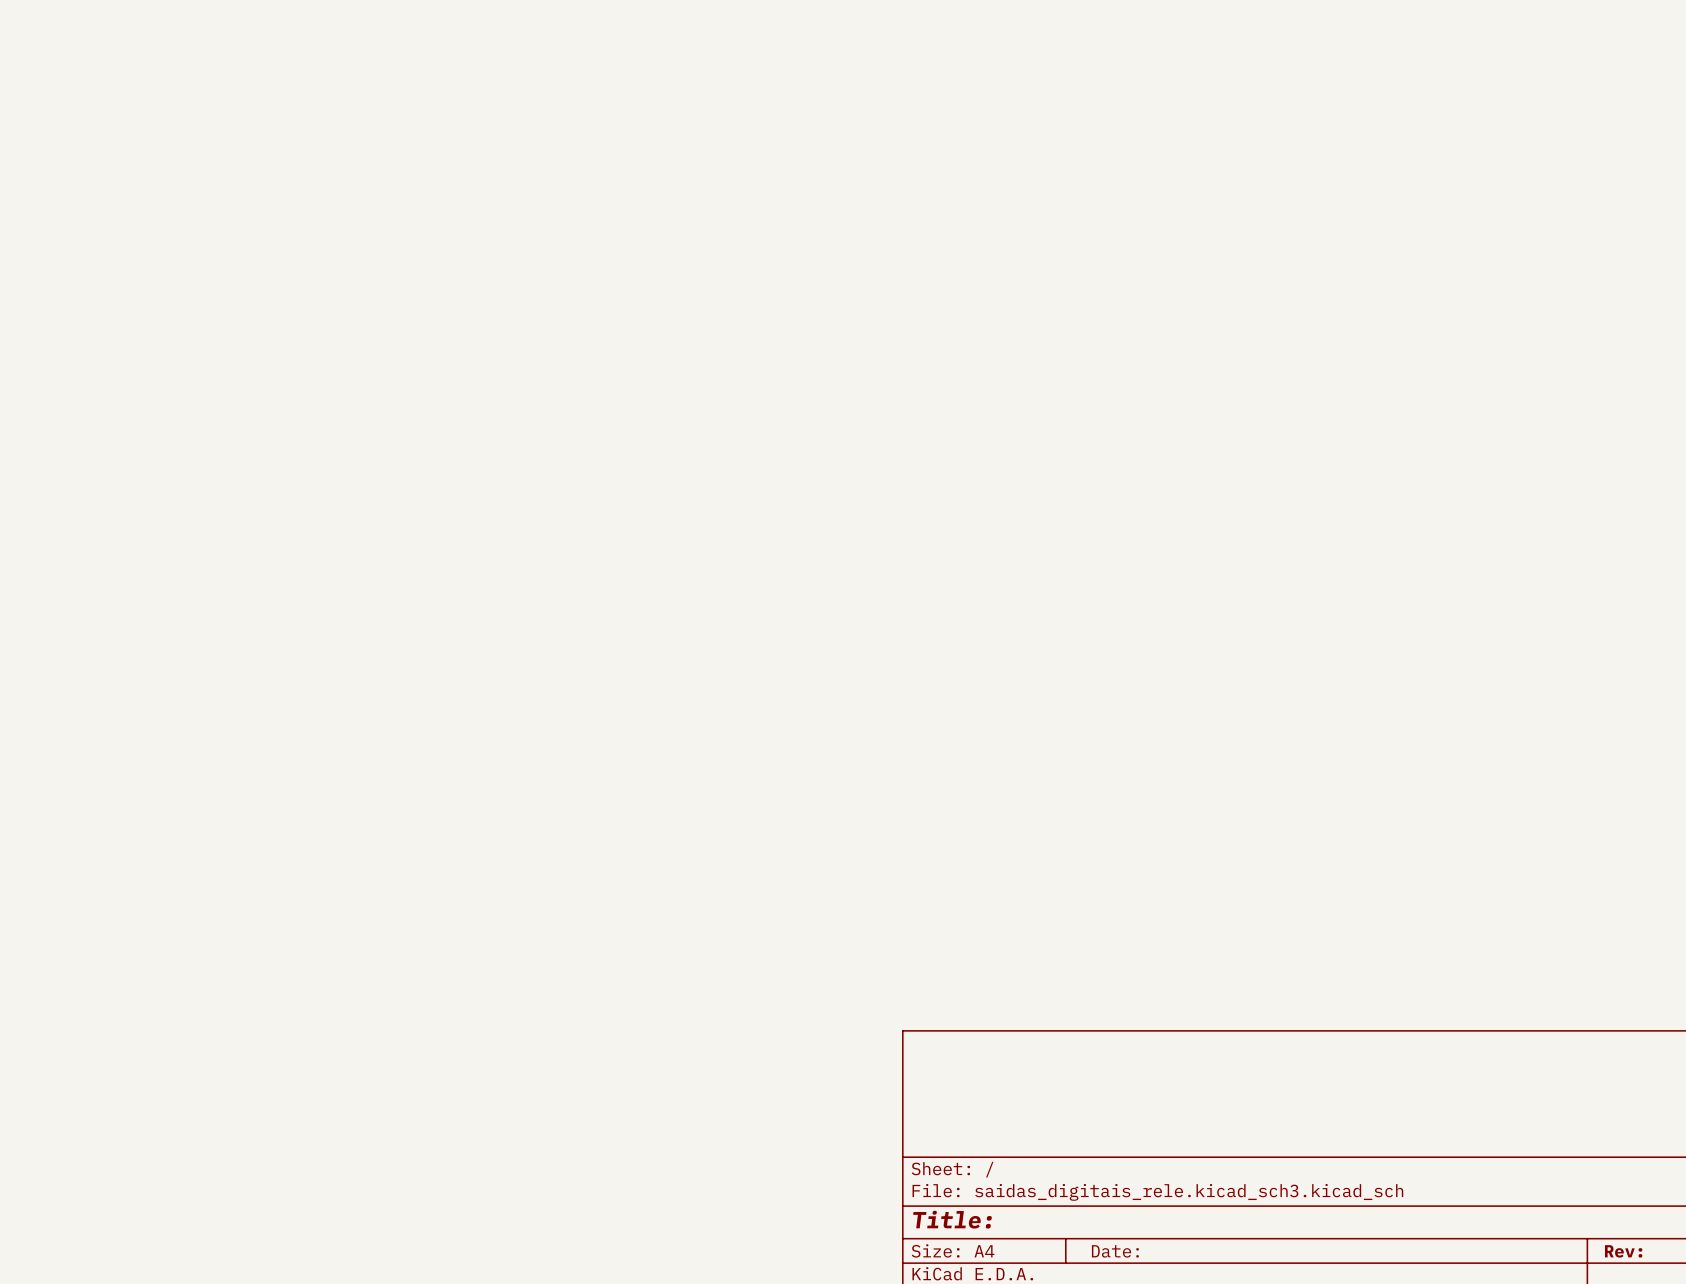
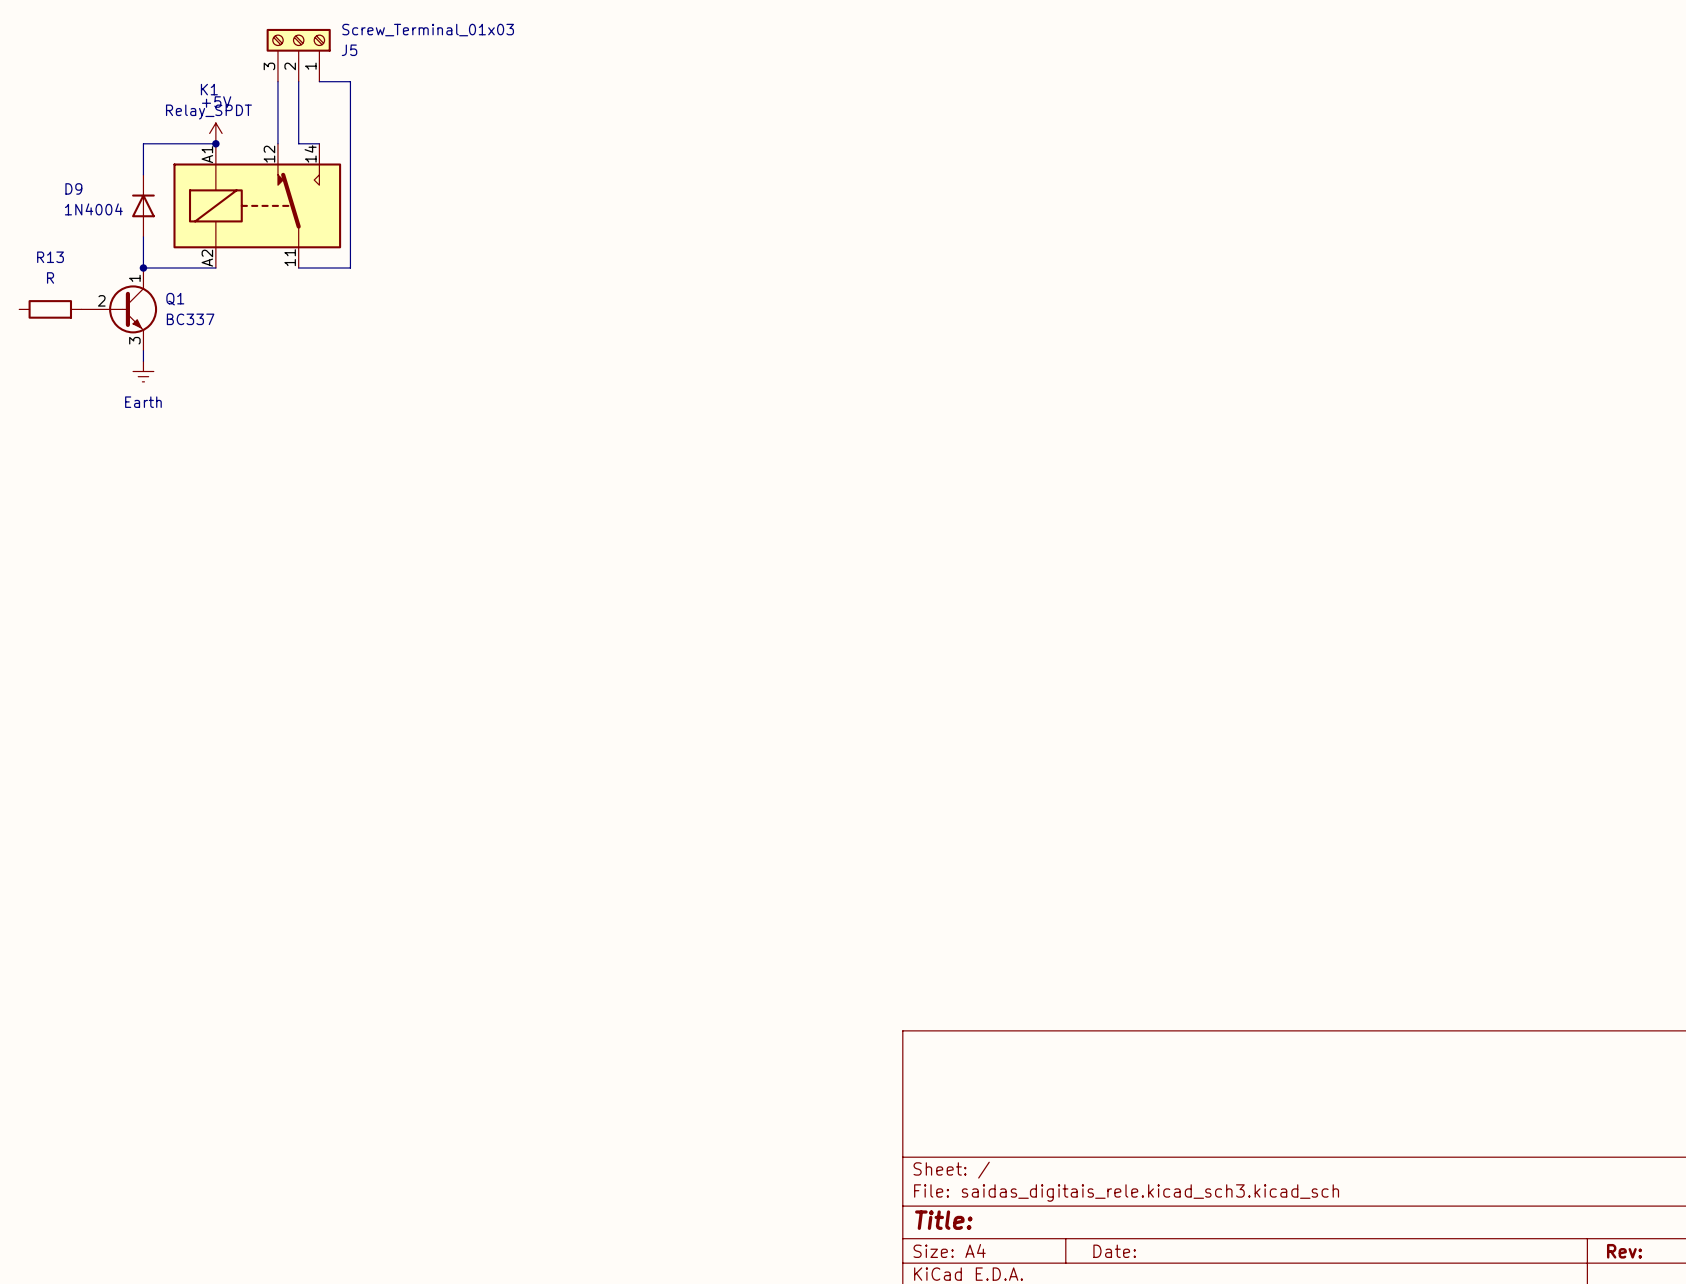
J5: none -> Screw_Terminal_01x03 (298, 55)
wire: none -> (277, 81) (277, 143)
wire: none -> (298, 81) (298, 143) (319, 143)
wire: none -> (319, 81) (350, 81) (350, 268) (298, 268)
power symbol: none -> +5V (215, 133)
wire: none -> (215, 143) (143, 143) (143, 174)
junction: none -> (215, 143)
D9: none -> 1N4004 (143, 205)
K1: none -> Relay_SPDT (257, 205)
wire: none -> (143, 236) (143, 268) (215, 268)
junction: none -> (143, 268)
R13: none -> R (50, 309)
Q1: none -> BC337 (119, 309)
wire: none -> (143, 350) (143, 361)
power symbol: none -> Earth (143, 371)

